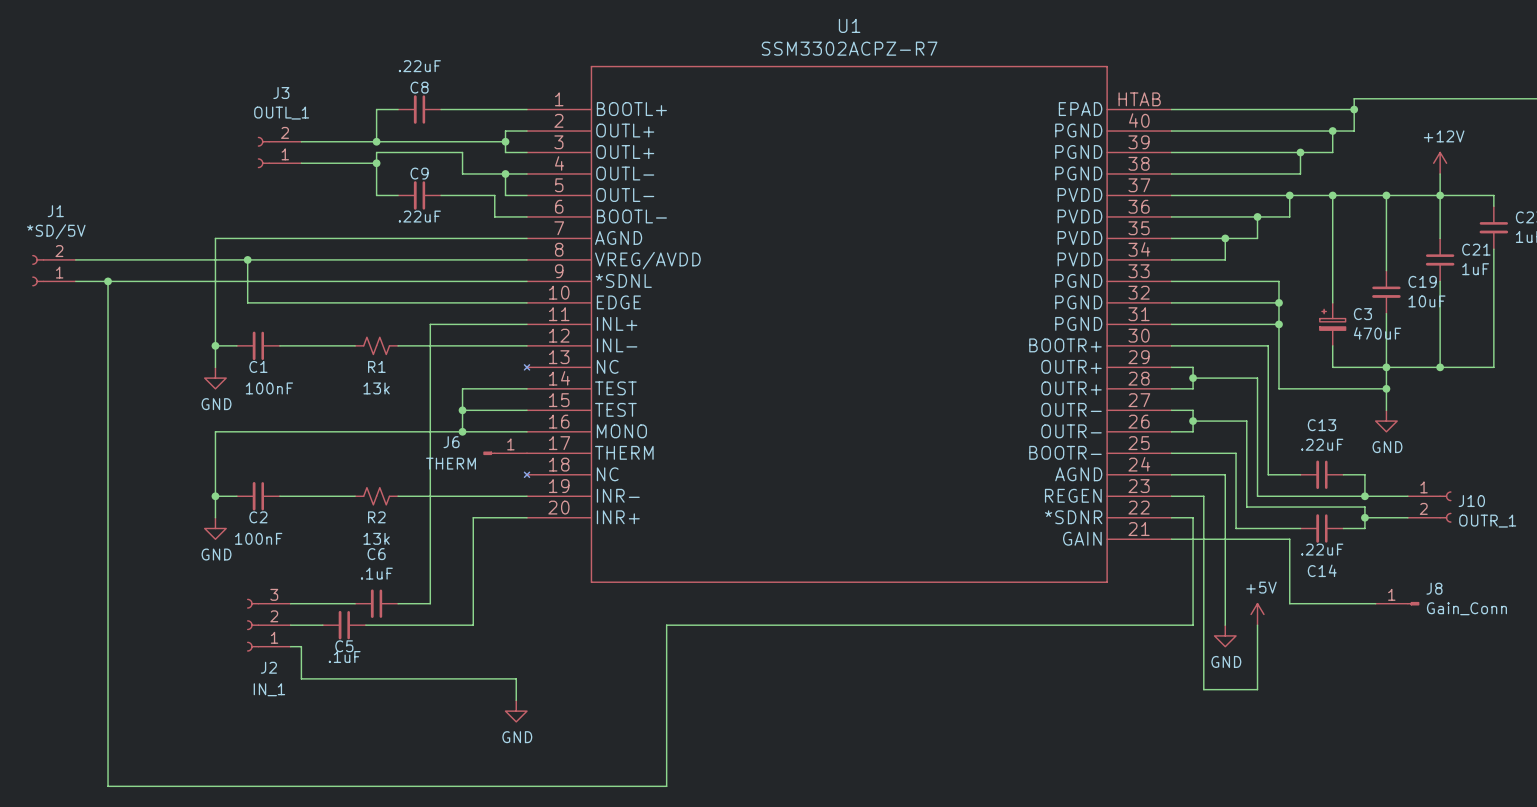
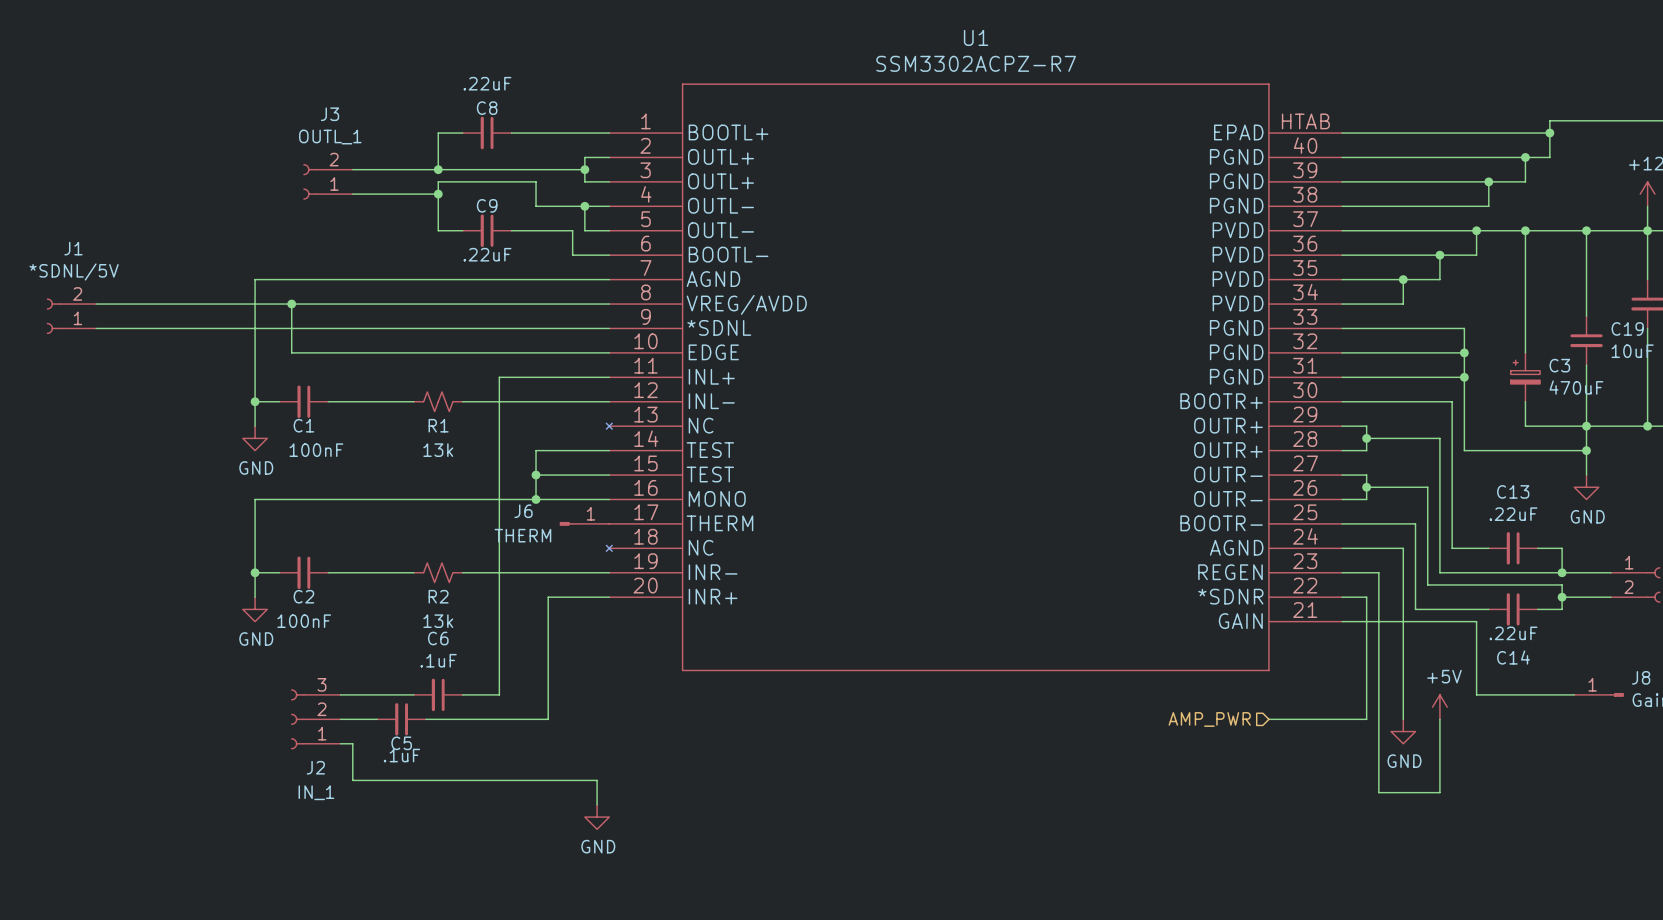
J1 value: *SD/5V (56, 231) -> *SDNL/5V (74, 272)
wire: (108, 281) (108, 786) (666, 786) (666, 625) (1107, 625) -> none
junction: (108, 281) -> none
hierarchical label: none -> AMP_PWR (1209, 719)

